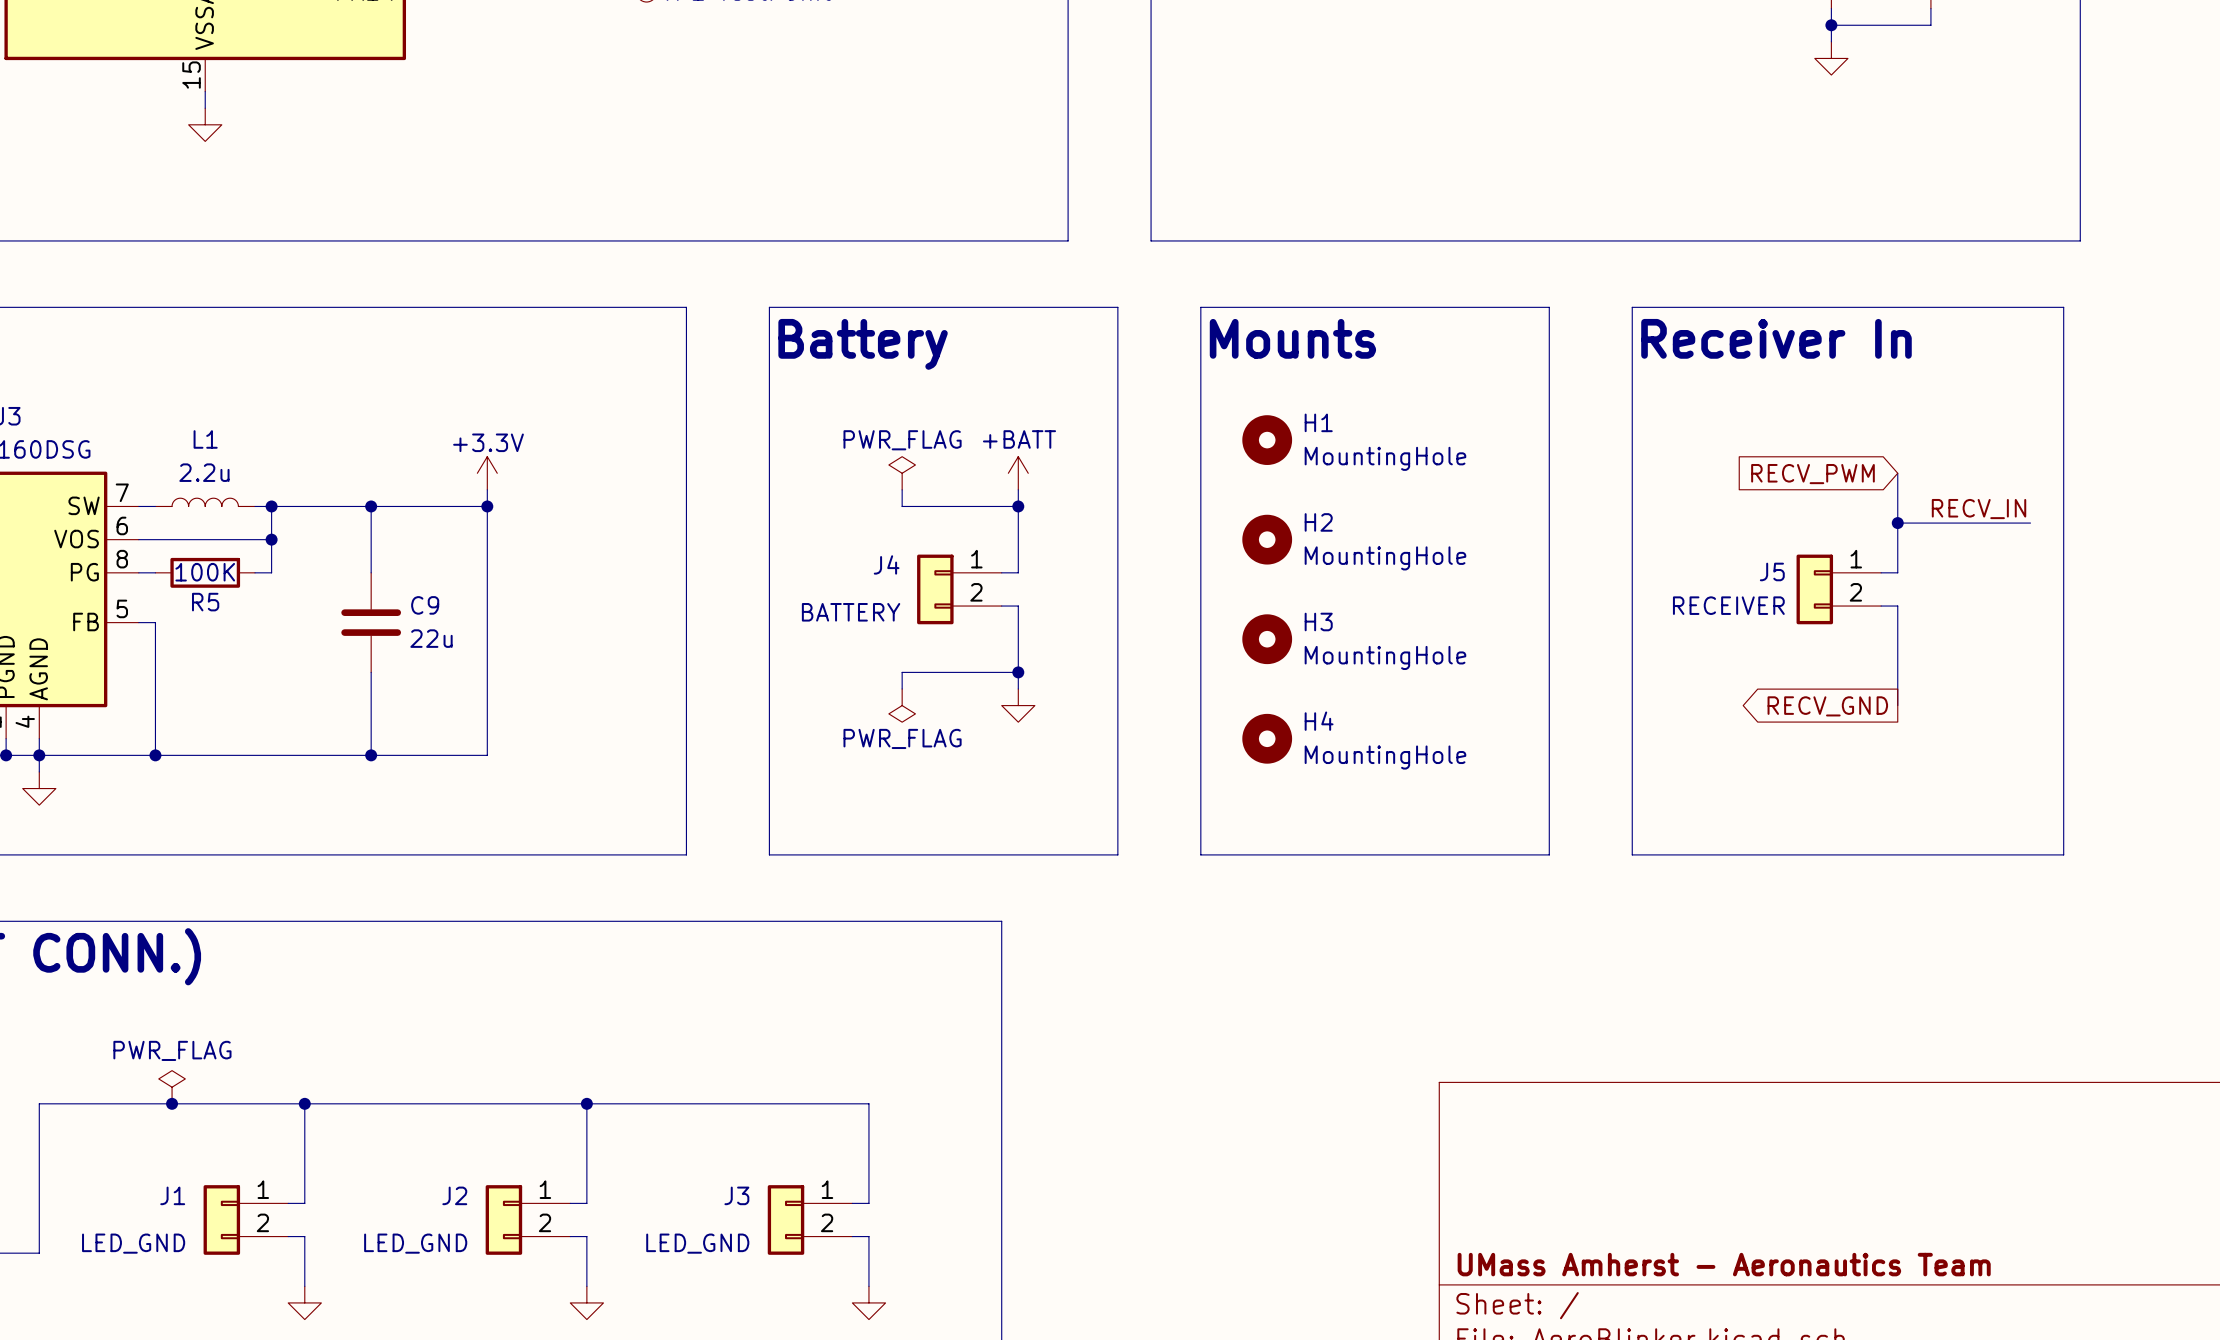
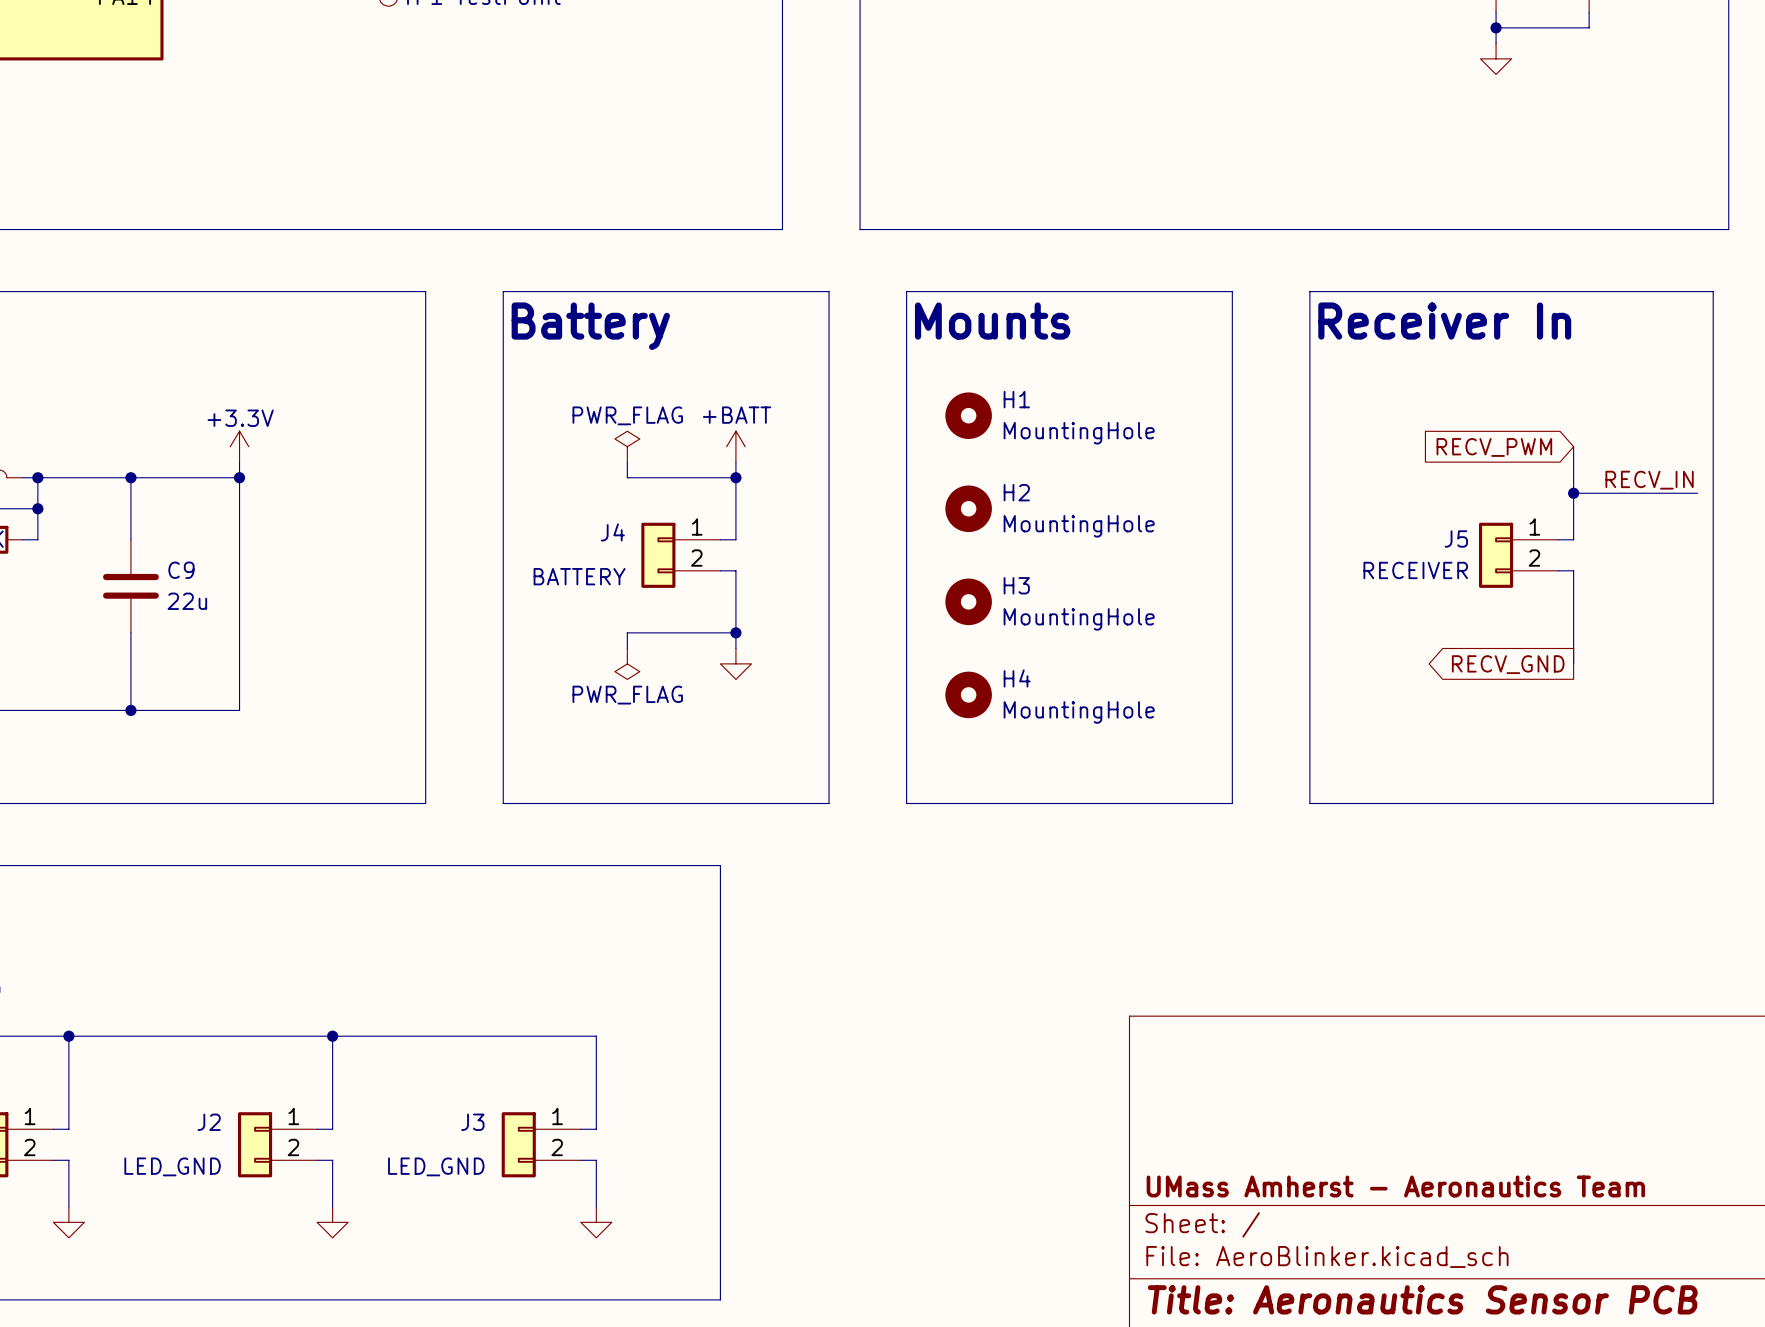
wire: (1897, 473) (1897, 572) (1881, 572) -> (1573, 446) (1573, 539) (1558, 539)
global label position: RECV_PWM (1812, 474) -> RECV_PWM (1494, 447)
label position: RECV_IN (1979, 509) -> RECV_IN (1649, 480)
wire: (1897, 523) (1914, 523) -> (1682, 493) (1697, 493)
junction position: (1897, 523) -> (1573, 493)
J5 position: (1838, 589) -> (1518, 555)
wire: (1881, 606) (1897, 606) (1897, 705) -> (1558, 570) (1573, 570) (1573, 663)
global label position: RECV_GND (1827, 706) -> RECV_GND (1508, 664)

